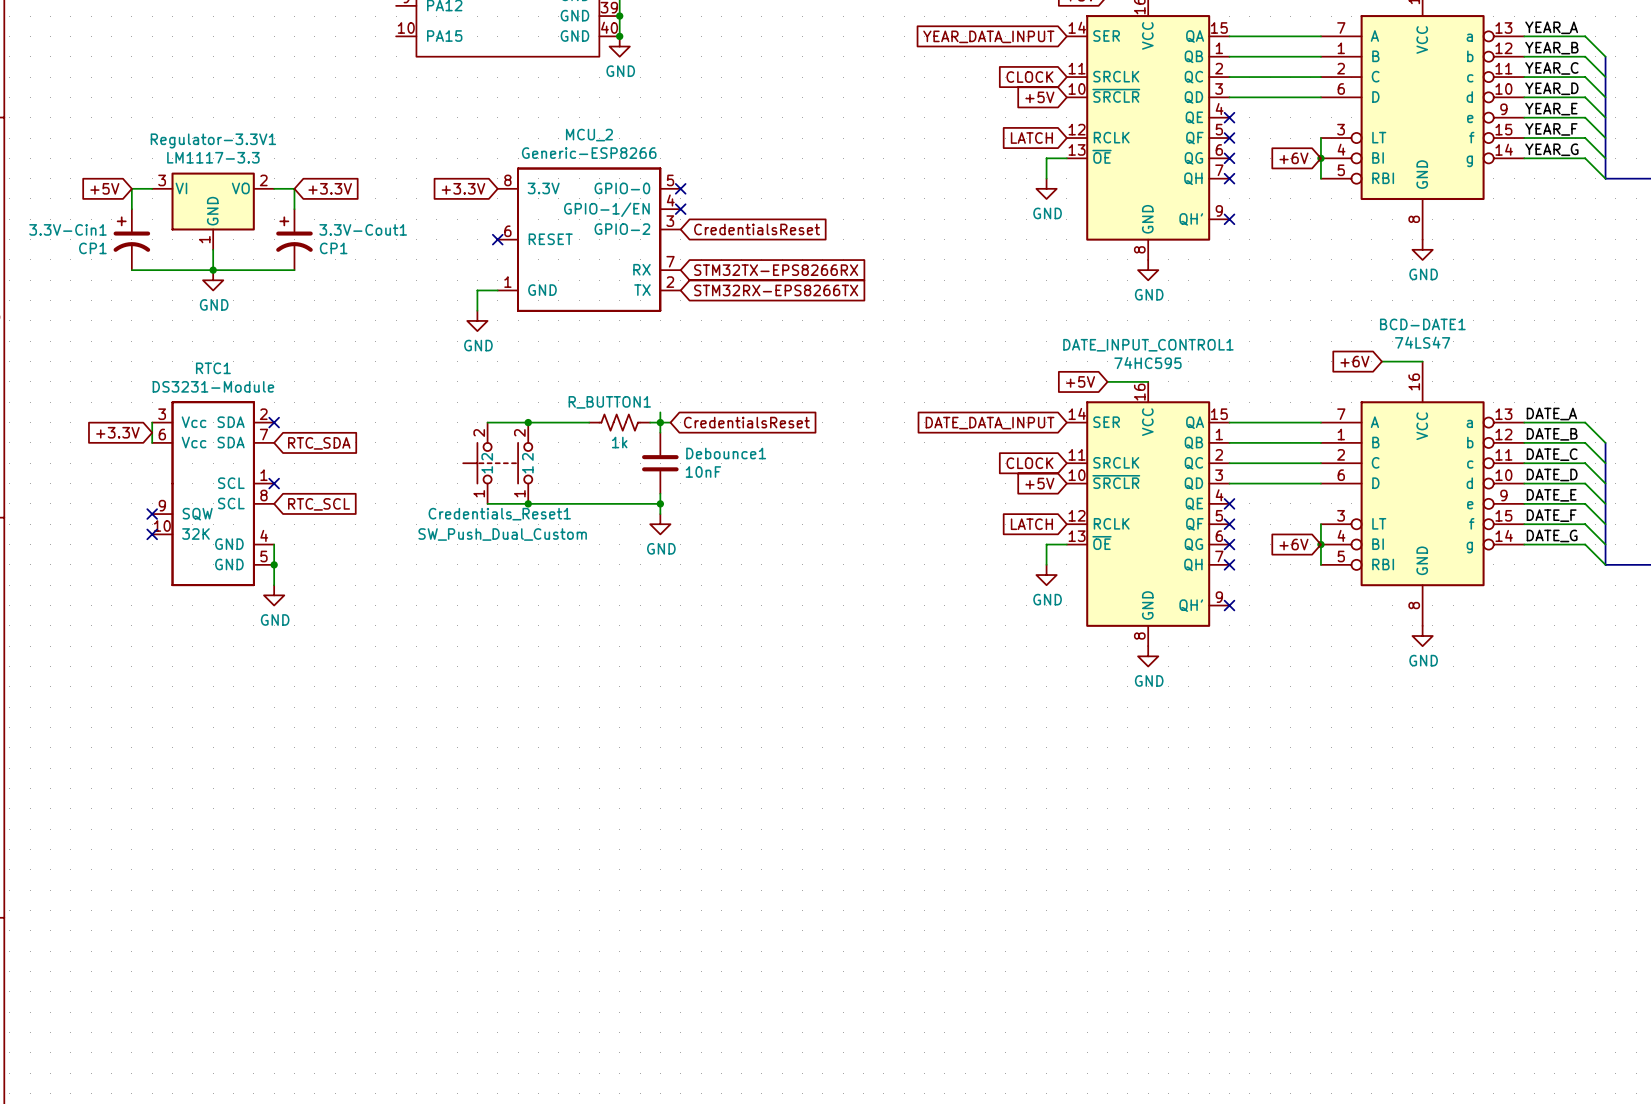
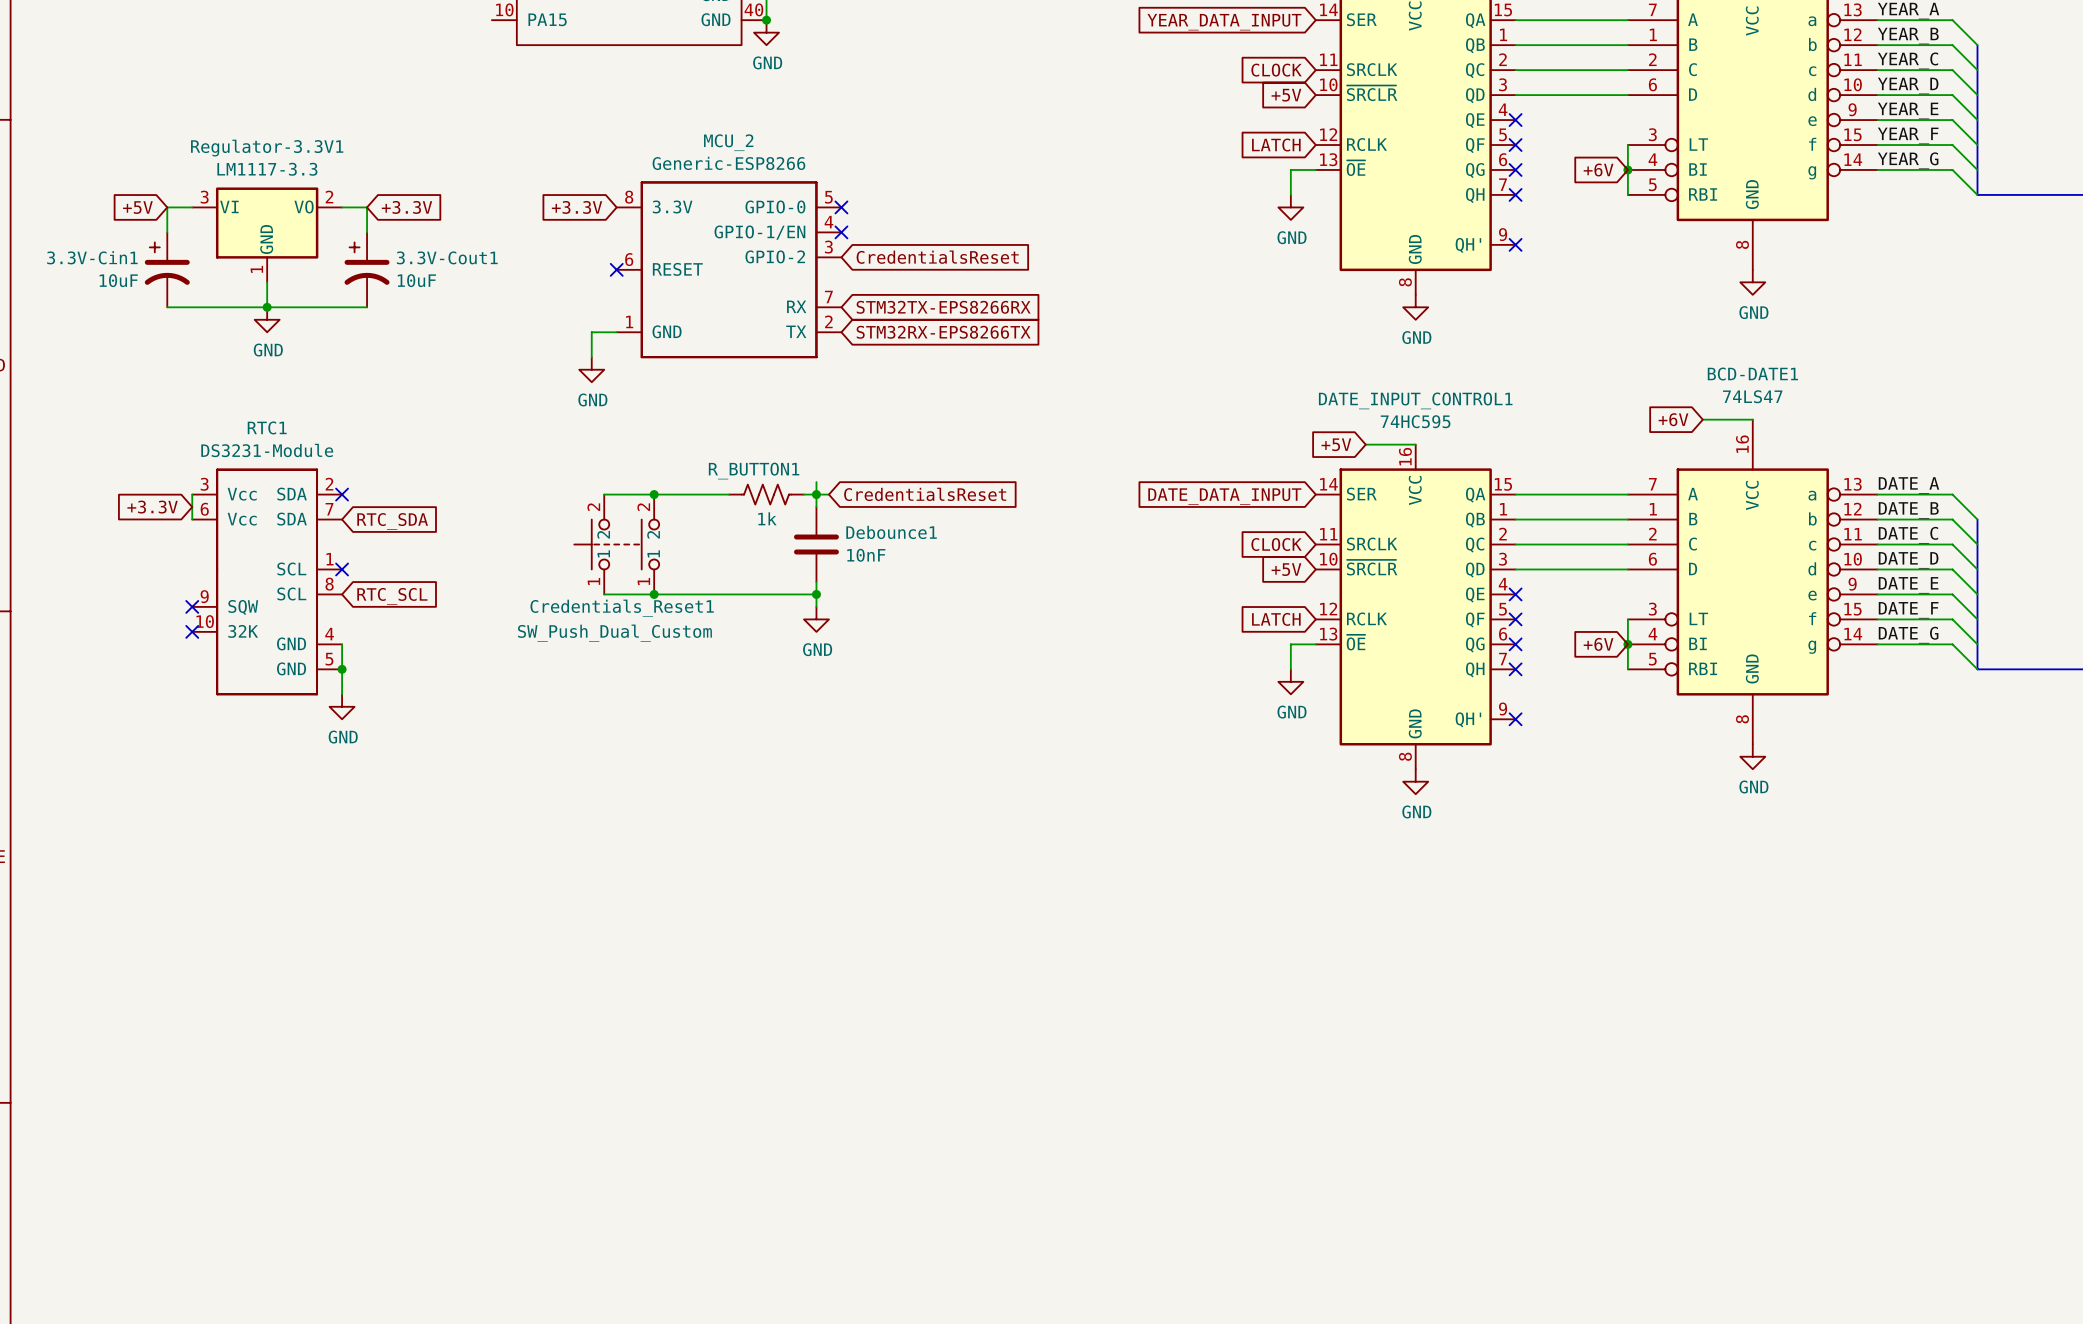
3.3V-Cin1 value: CP1 (92, 248) -> 10uF (118, 280)
3.3V-Cout1 value: CP1 (333, 248) -> 10uF (416, 280)

